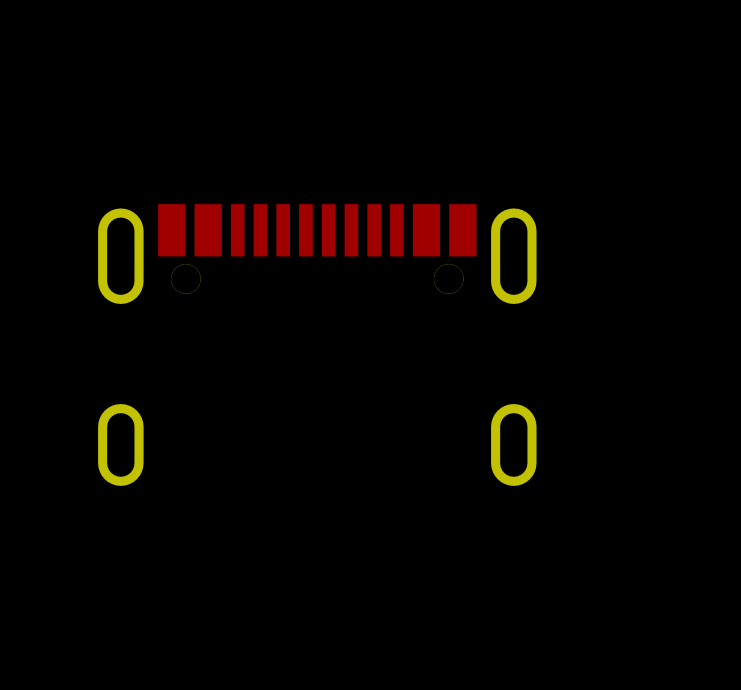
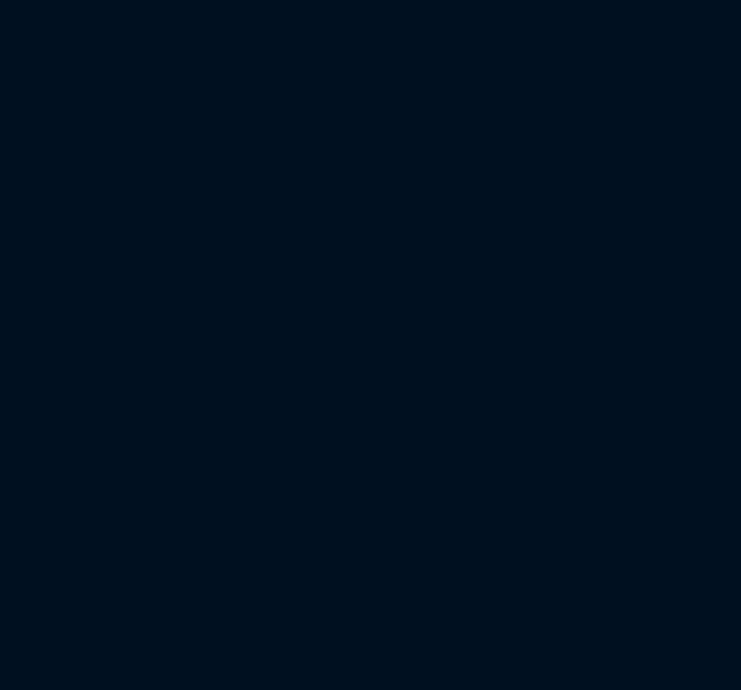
part: (317, 345) -> none

